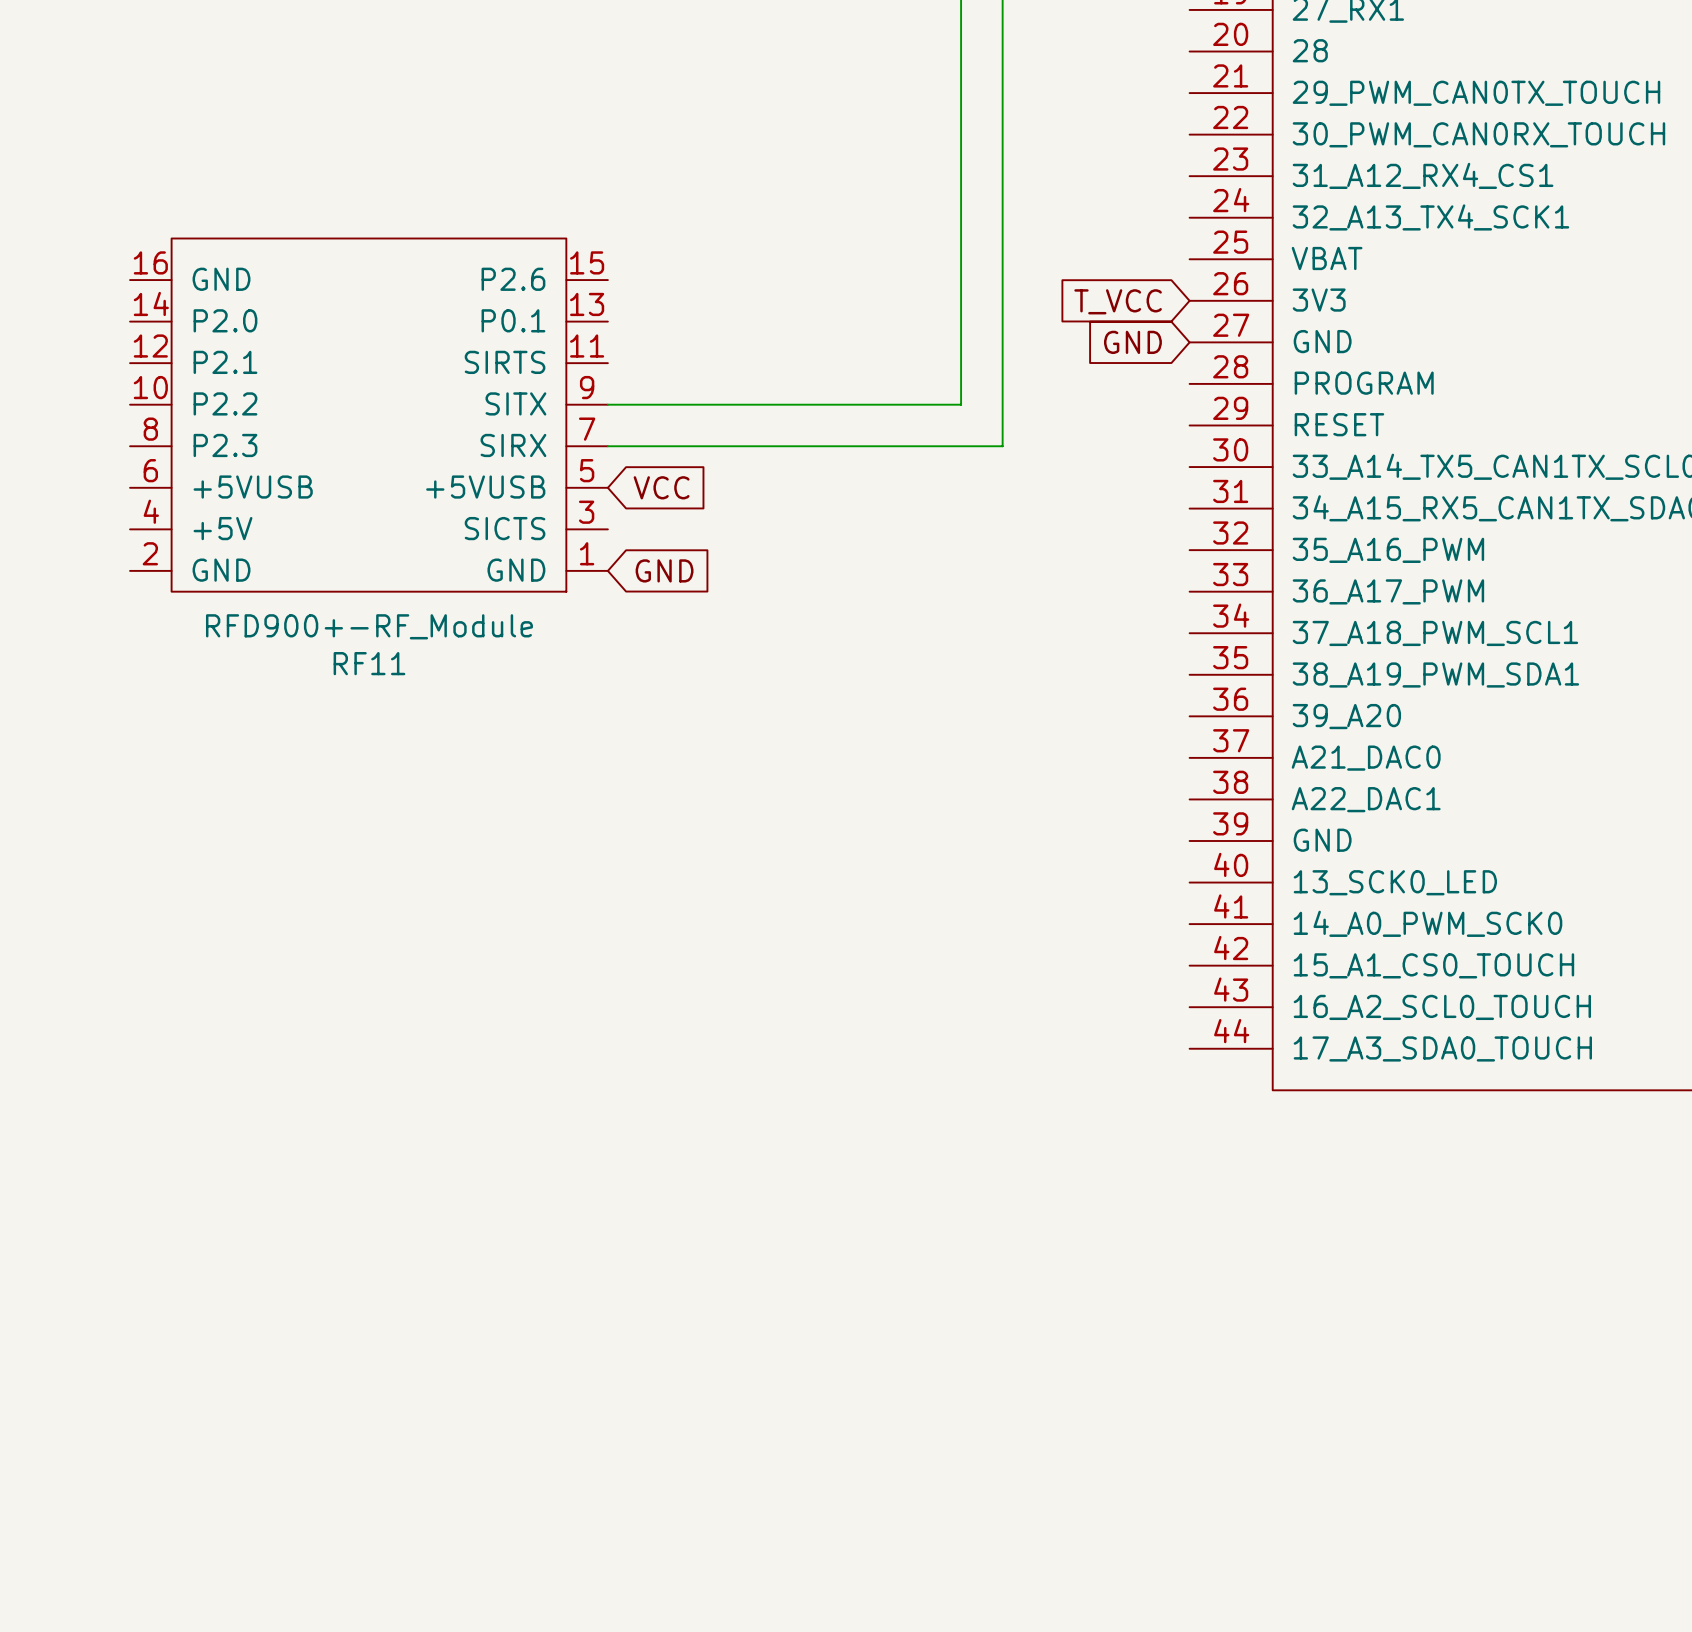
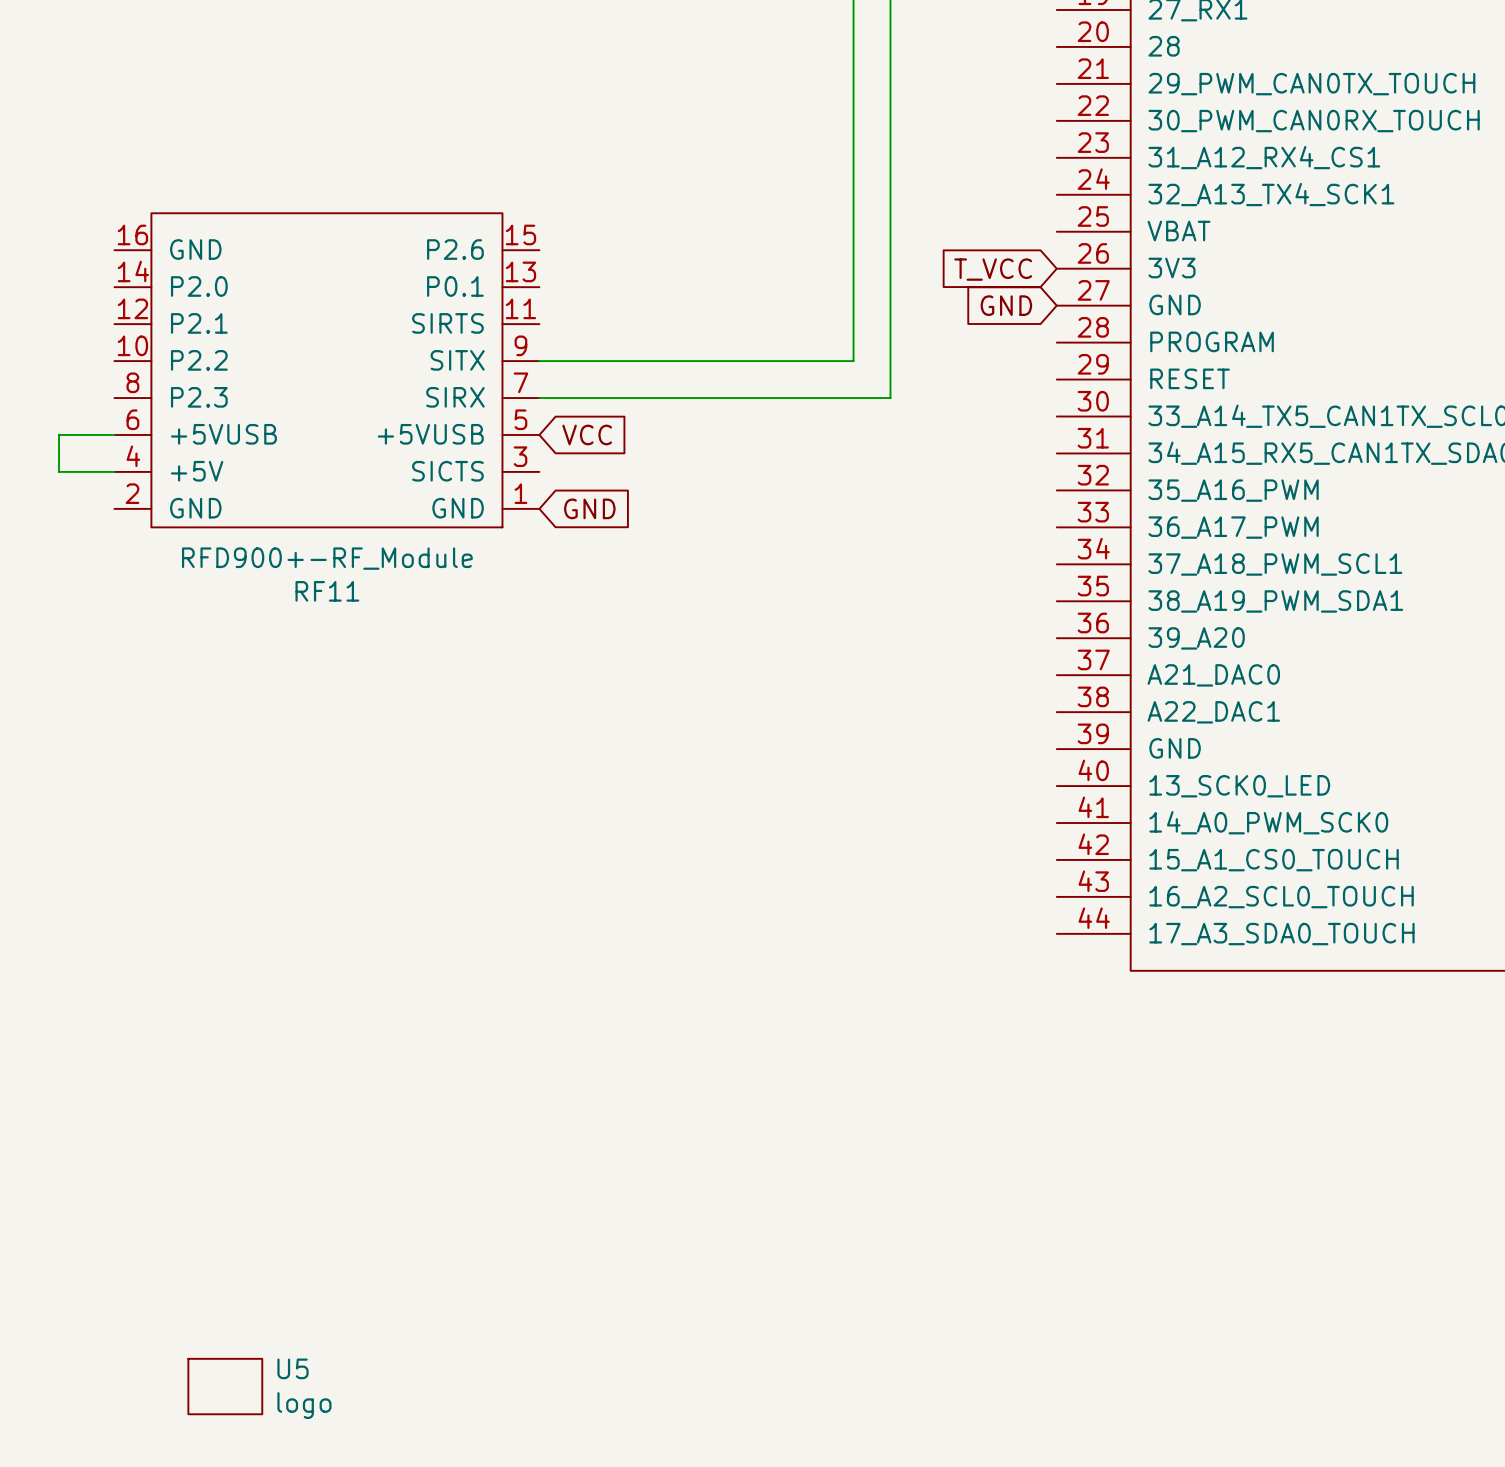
wire: none -> (114, 434) (59, 434) (59, 471) (114, 471)
U5: none -> logo (225, 1386)

